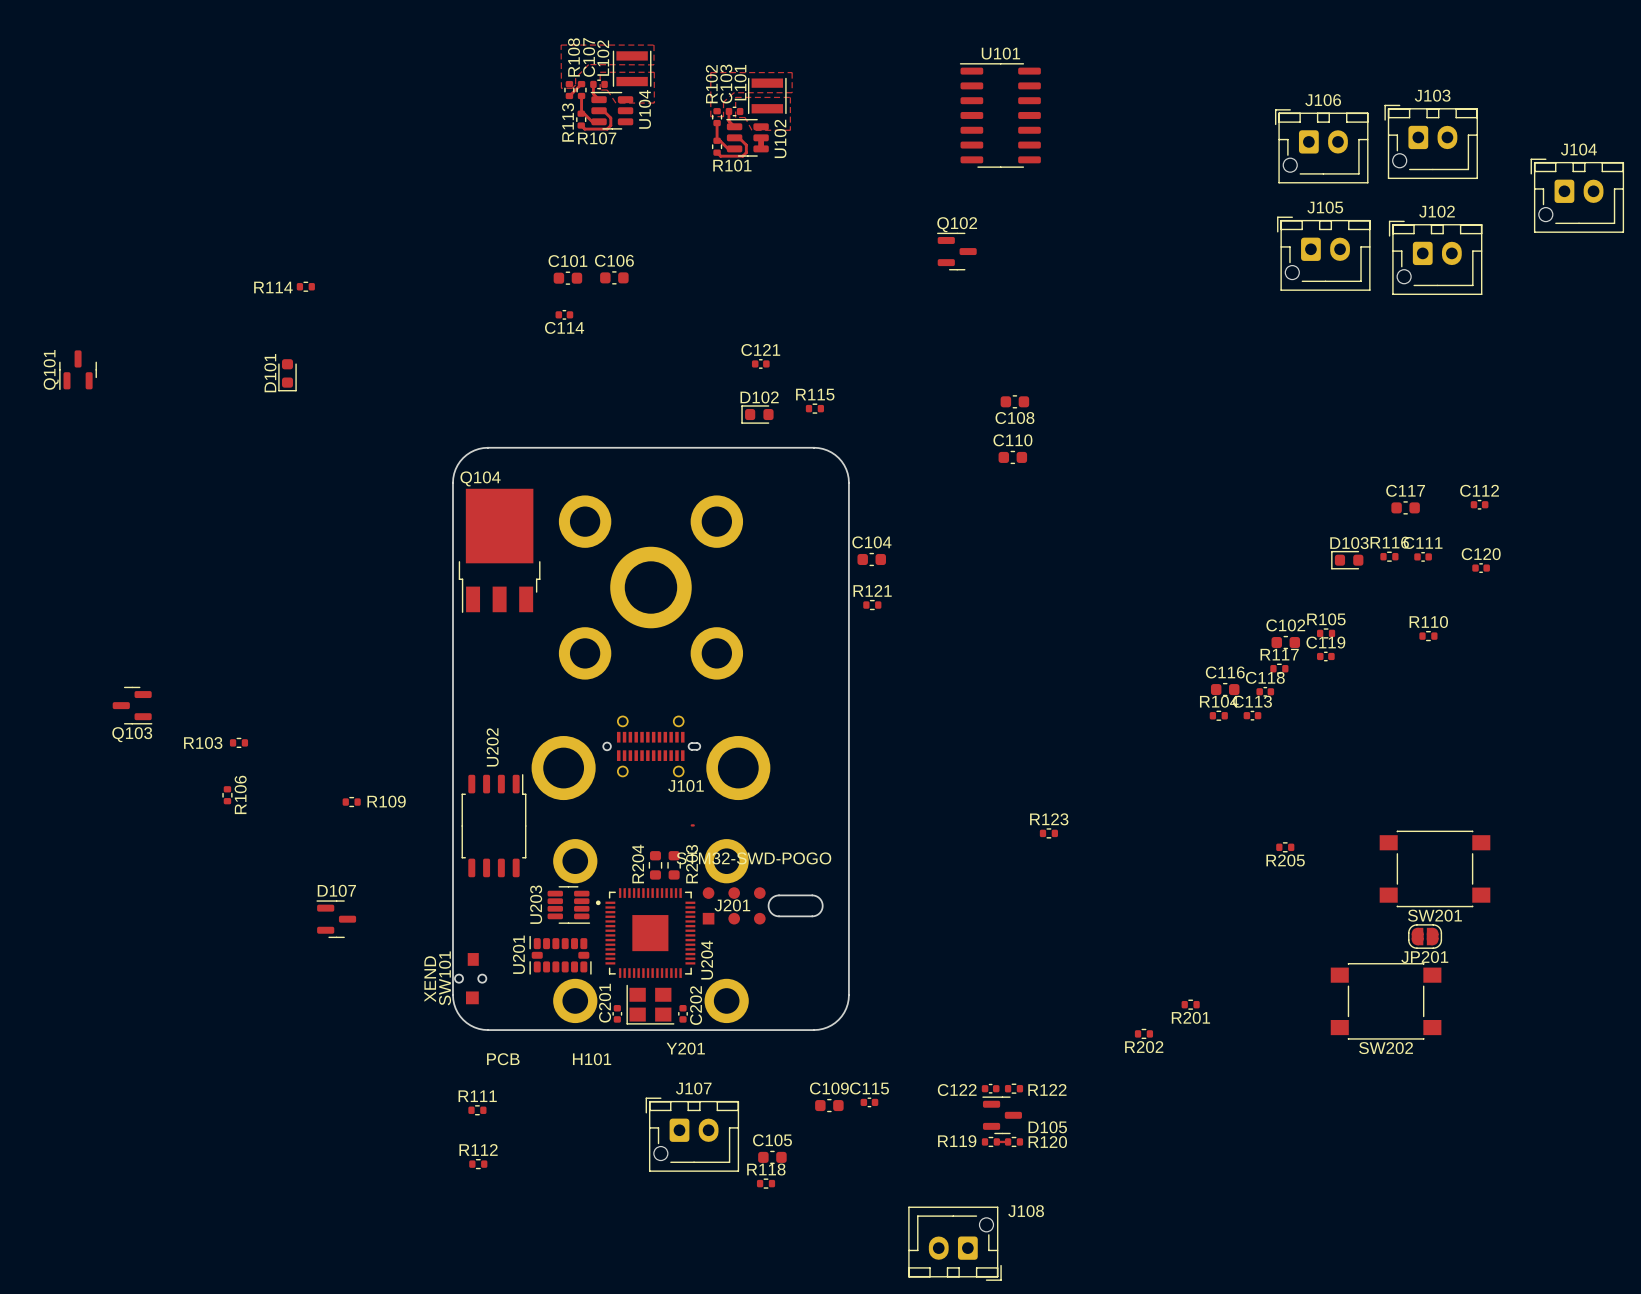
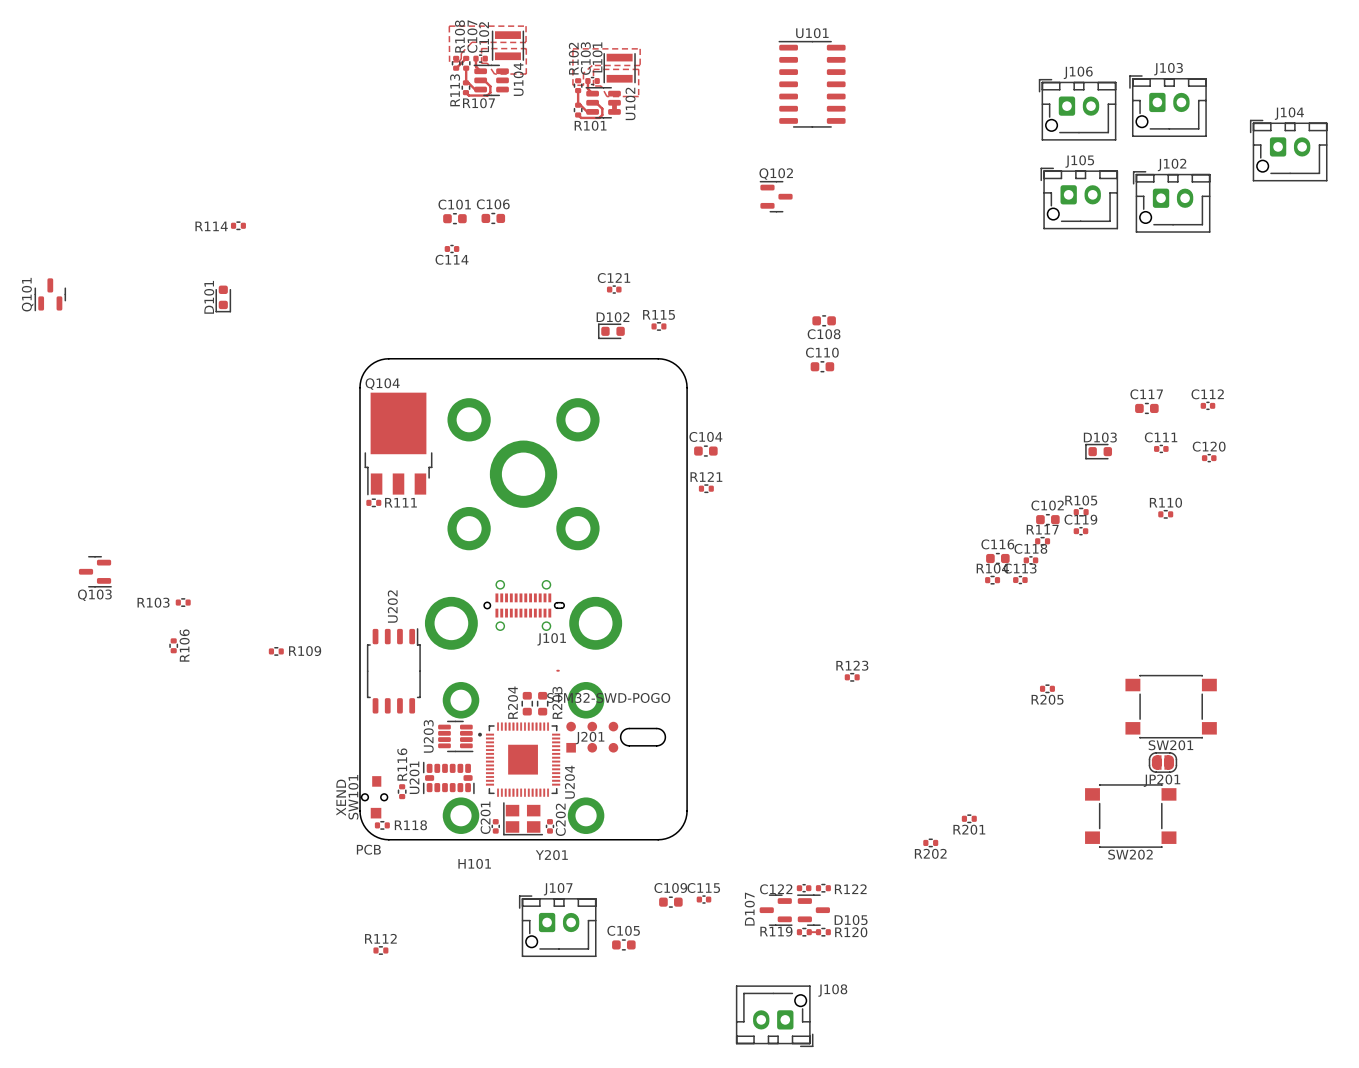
R116 rotation: 0° (1389, 556) -> 90° clockwise (402, 791)
R116 position: (1389, 556) -> (402, 791)
D107 name position: D107 (336, 890) -> D107 (749, 909)
D107 rotation: 0° (336, 919) -> 180° (776, 910)
D107 position: (336, 919) -> (776, 910)
H101 value position: PCB (503, 1059) -> PCB (368, 849)
R111 name position: R111 (477, 1096) -> R111 (400, 502)
R111 position: (477, 1110) -> (373, 502)
R118 name position: R118 (766, 1169) -> R118 (410, 825)
R118 position: (766, 1183) -> (382, 825)

